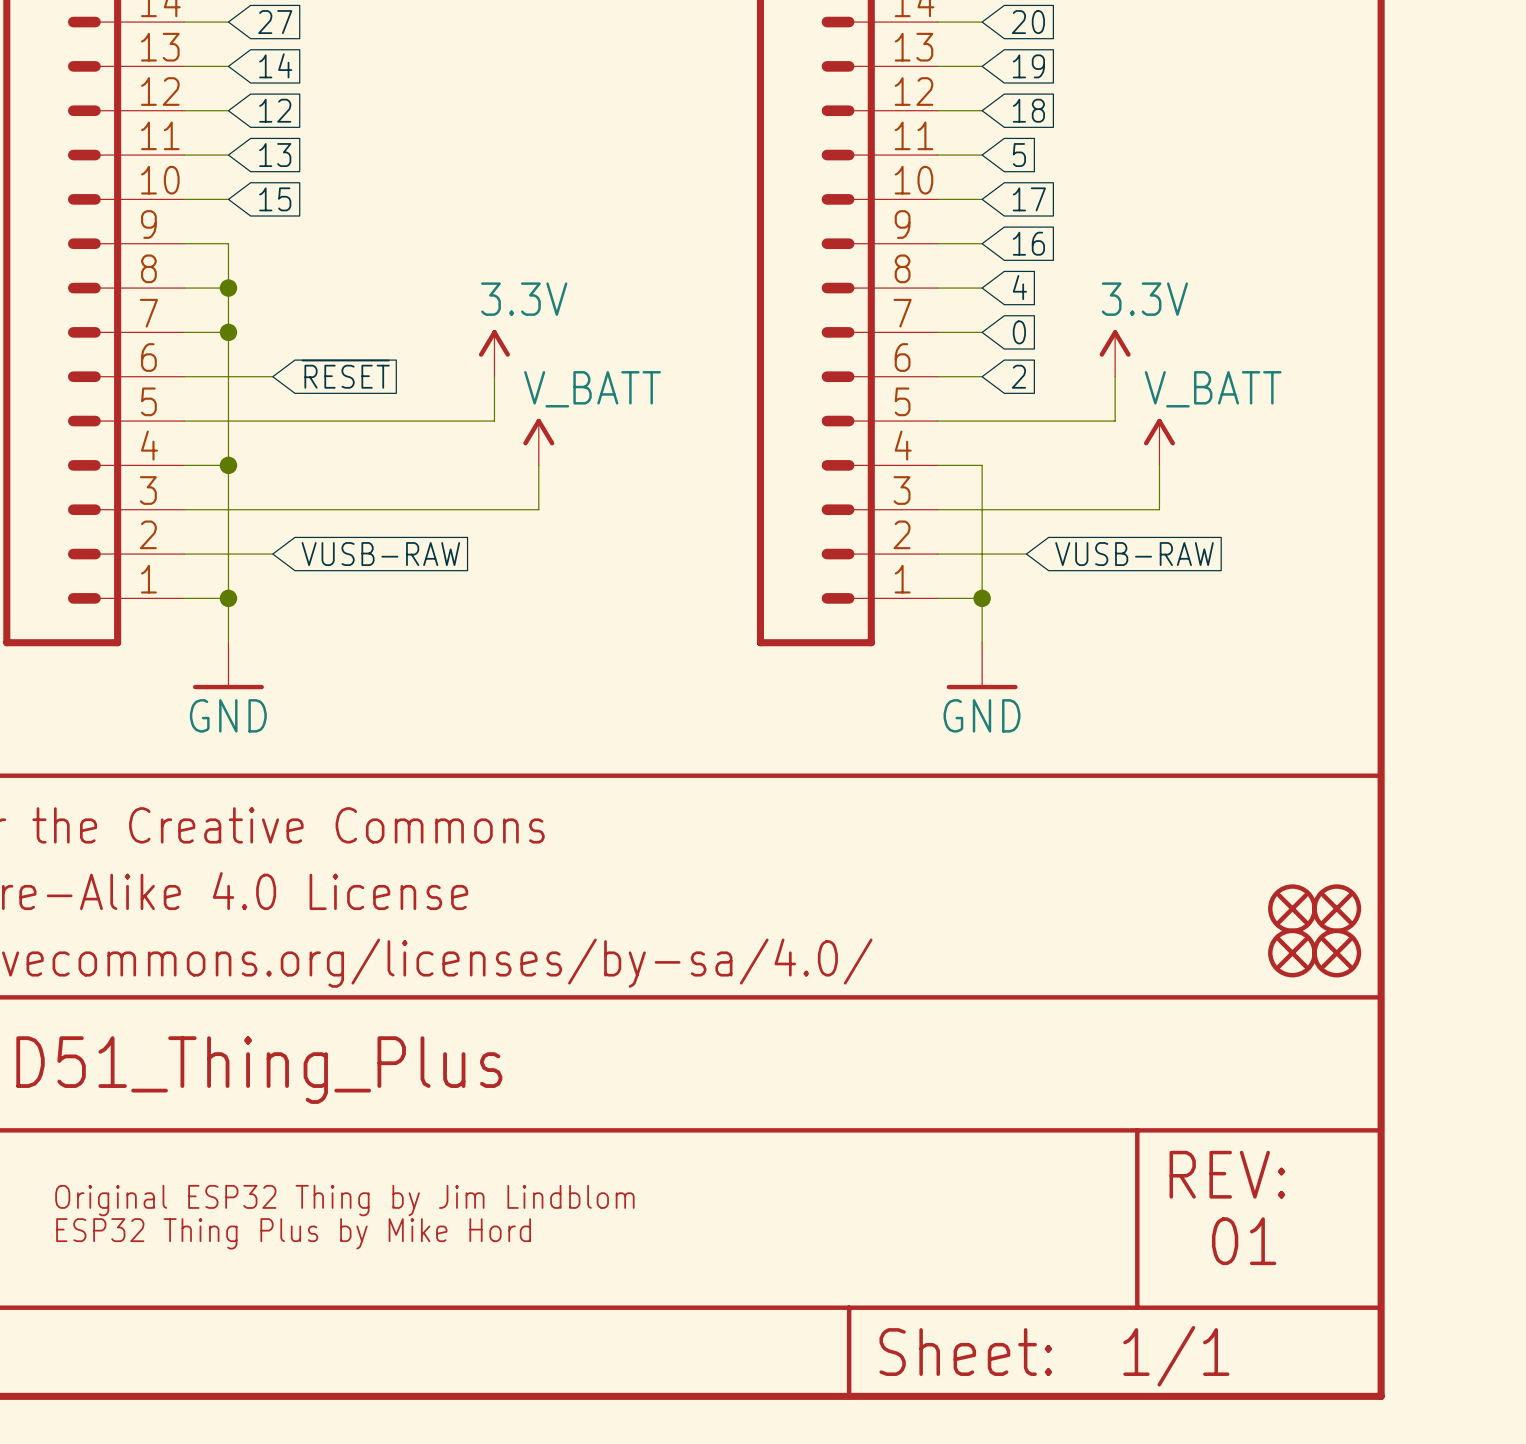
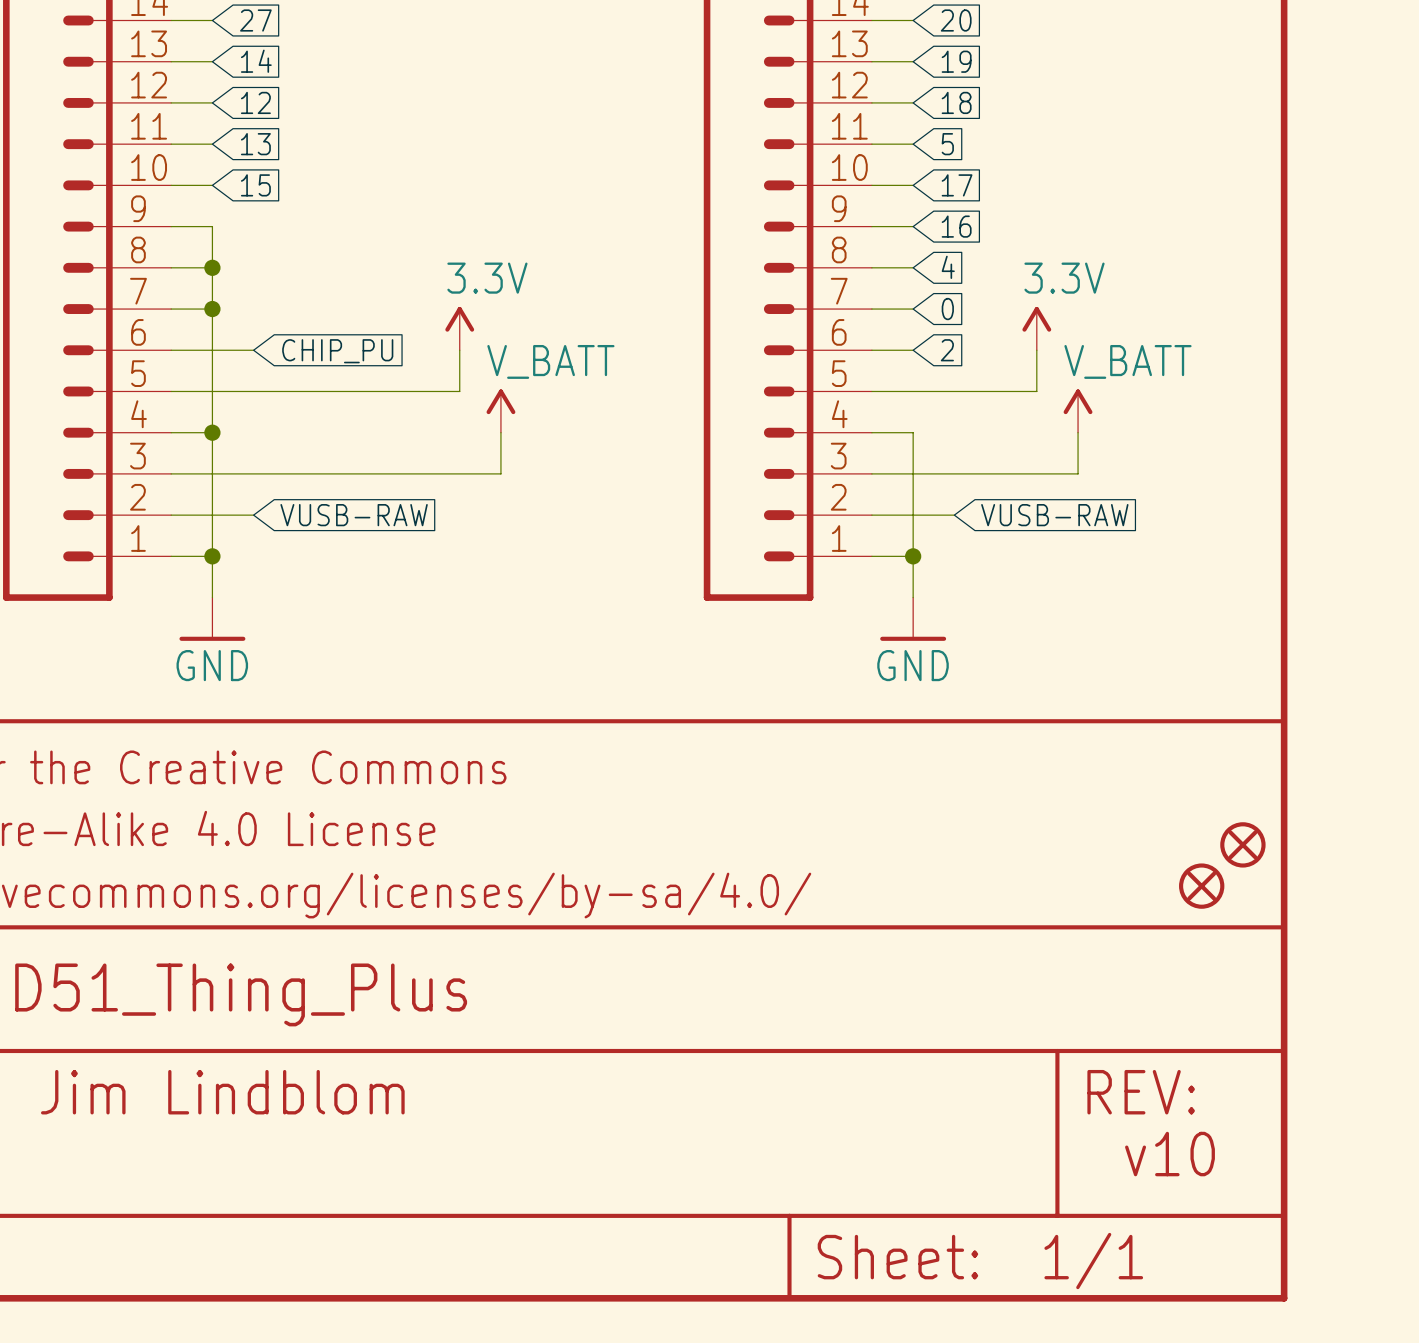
global label: ~{RESET} (345, 374) -> CHIP_PU (337, 351)
part: (1292, 908) -> none
part: (1336, 953) -> none
text: Original ESP32 Thing by Jim Lindblom (344, 1200) -> Jim Lindblom (222, 1092)
text: ESP32 Thing Plus by Mike Hord (293, 1233) -> none
text: 01 (1244, 1241) -> v10 (1170, 1154)

